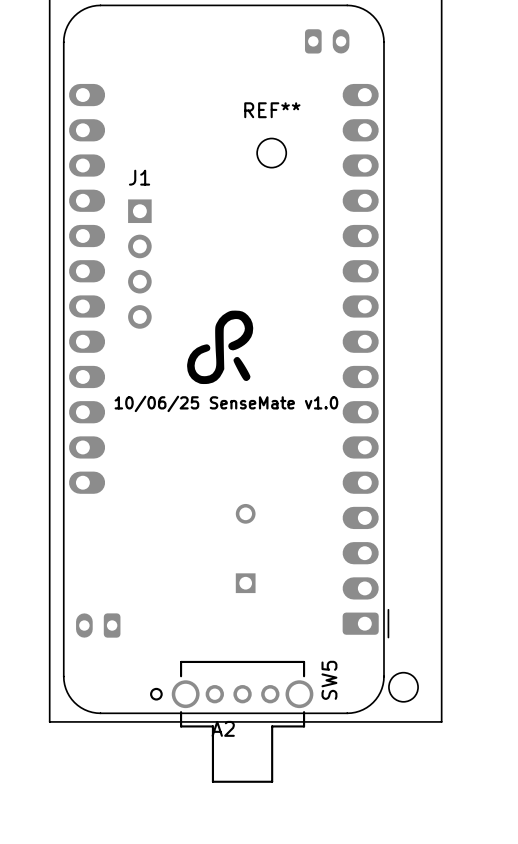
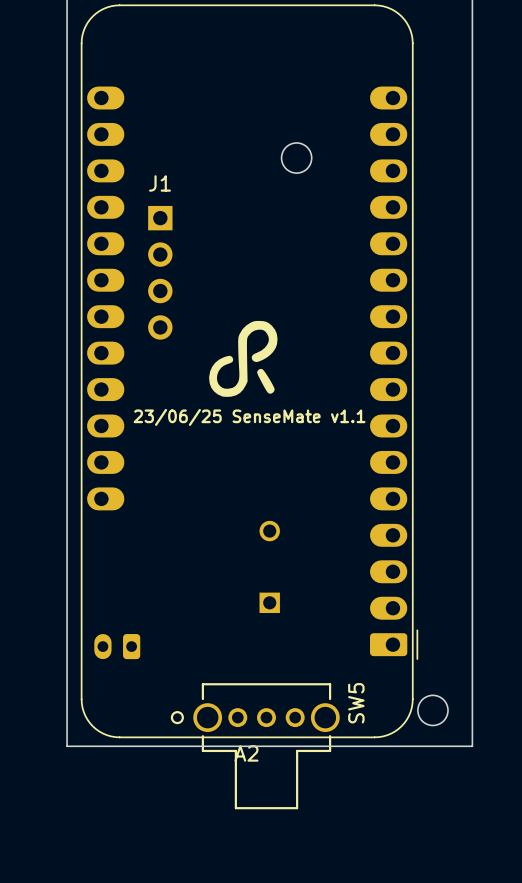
part: (327, 41) -> none
REF** name: REF** (272, 110) -> none
text: 10/06/25 SenseMate v1.0 (226, 403) -> 23/06/25 SenseMate v1.1 (249, 417)

